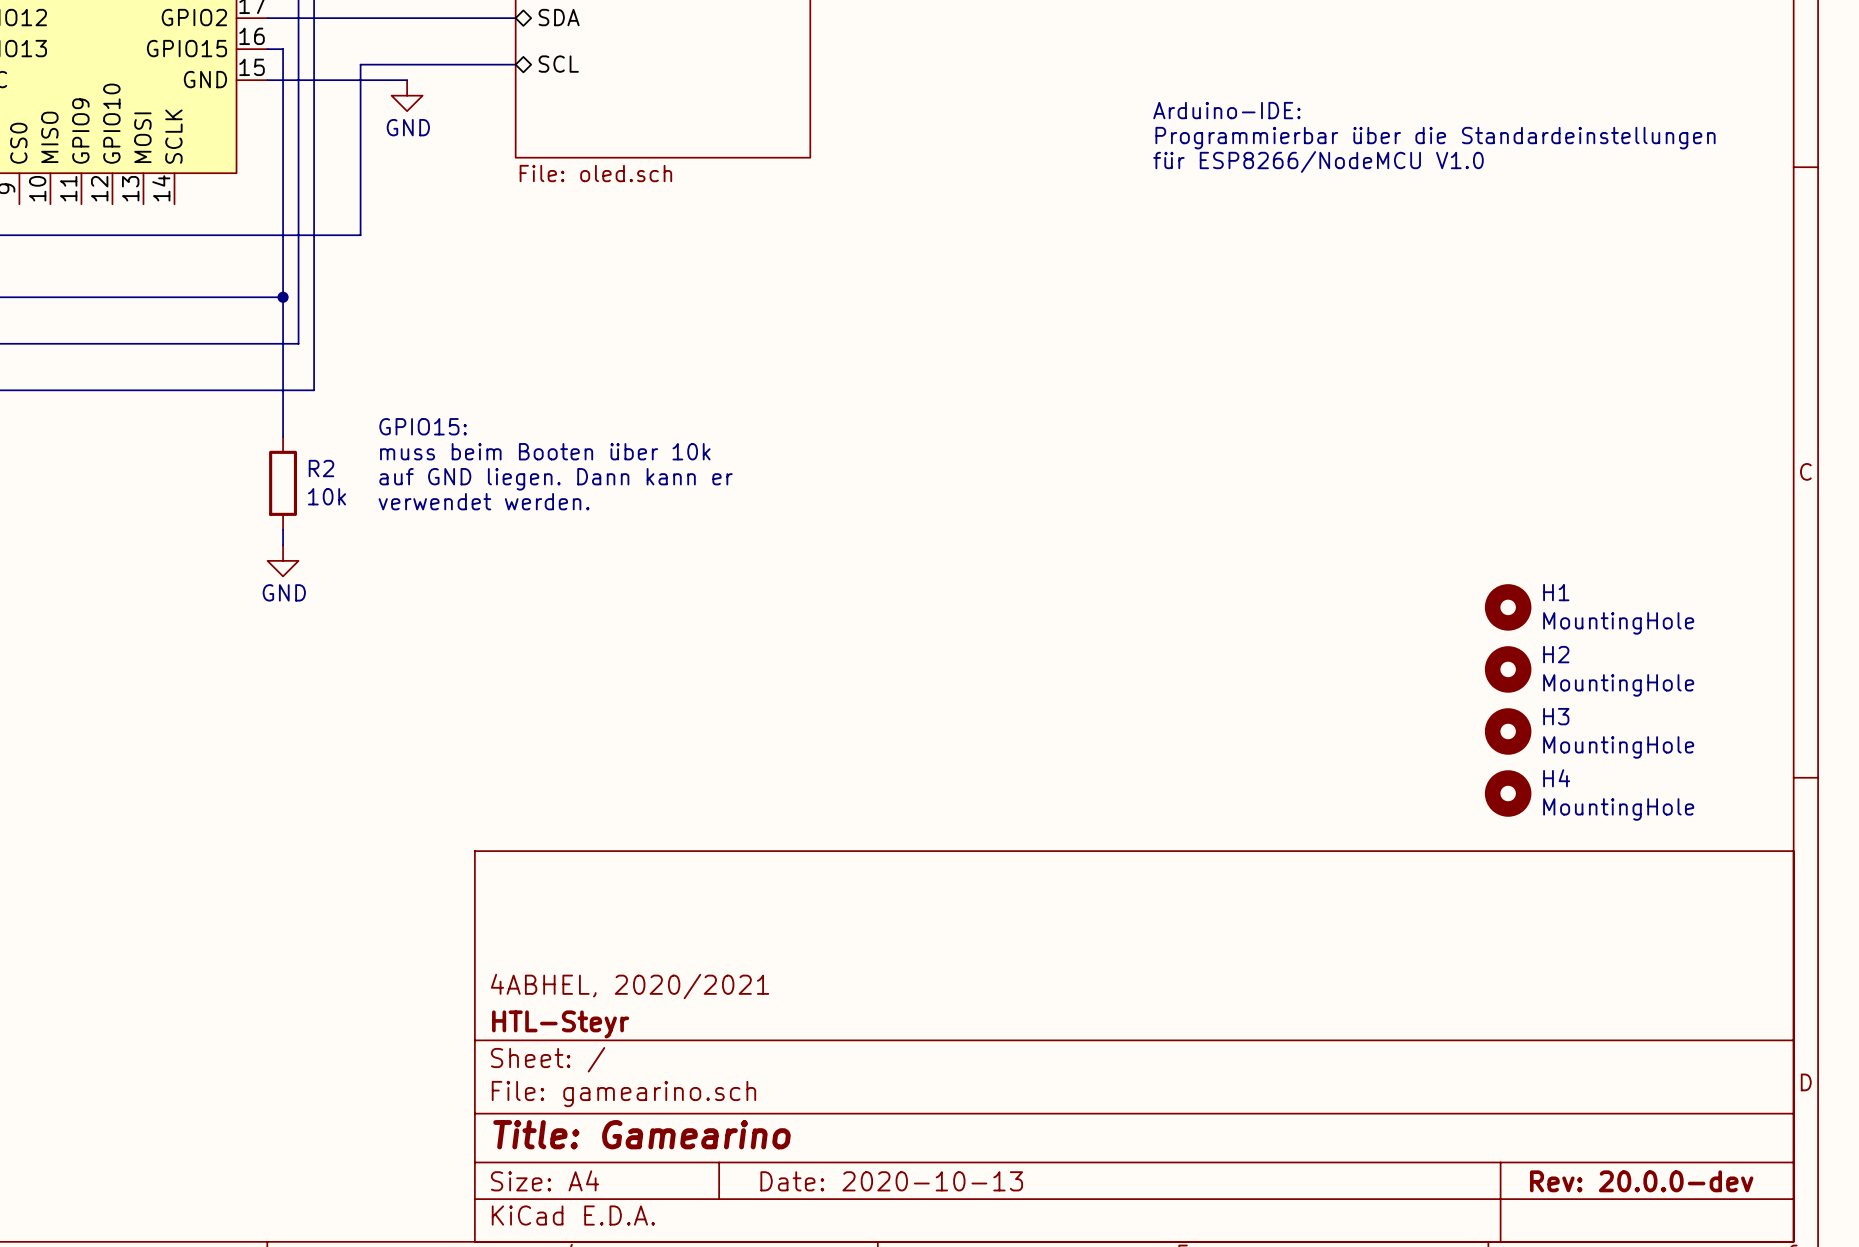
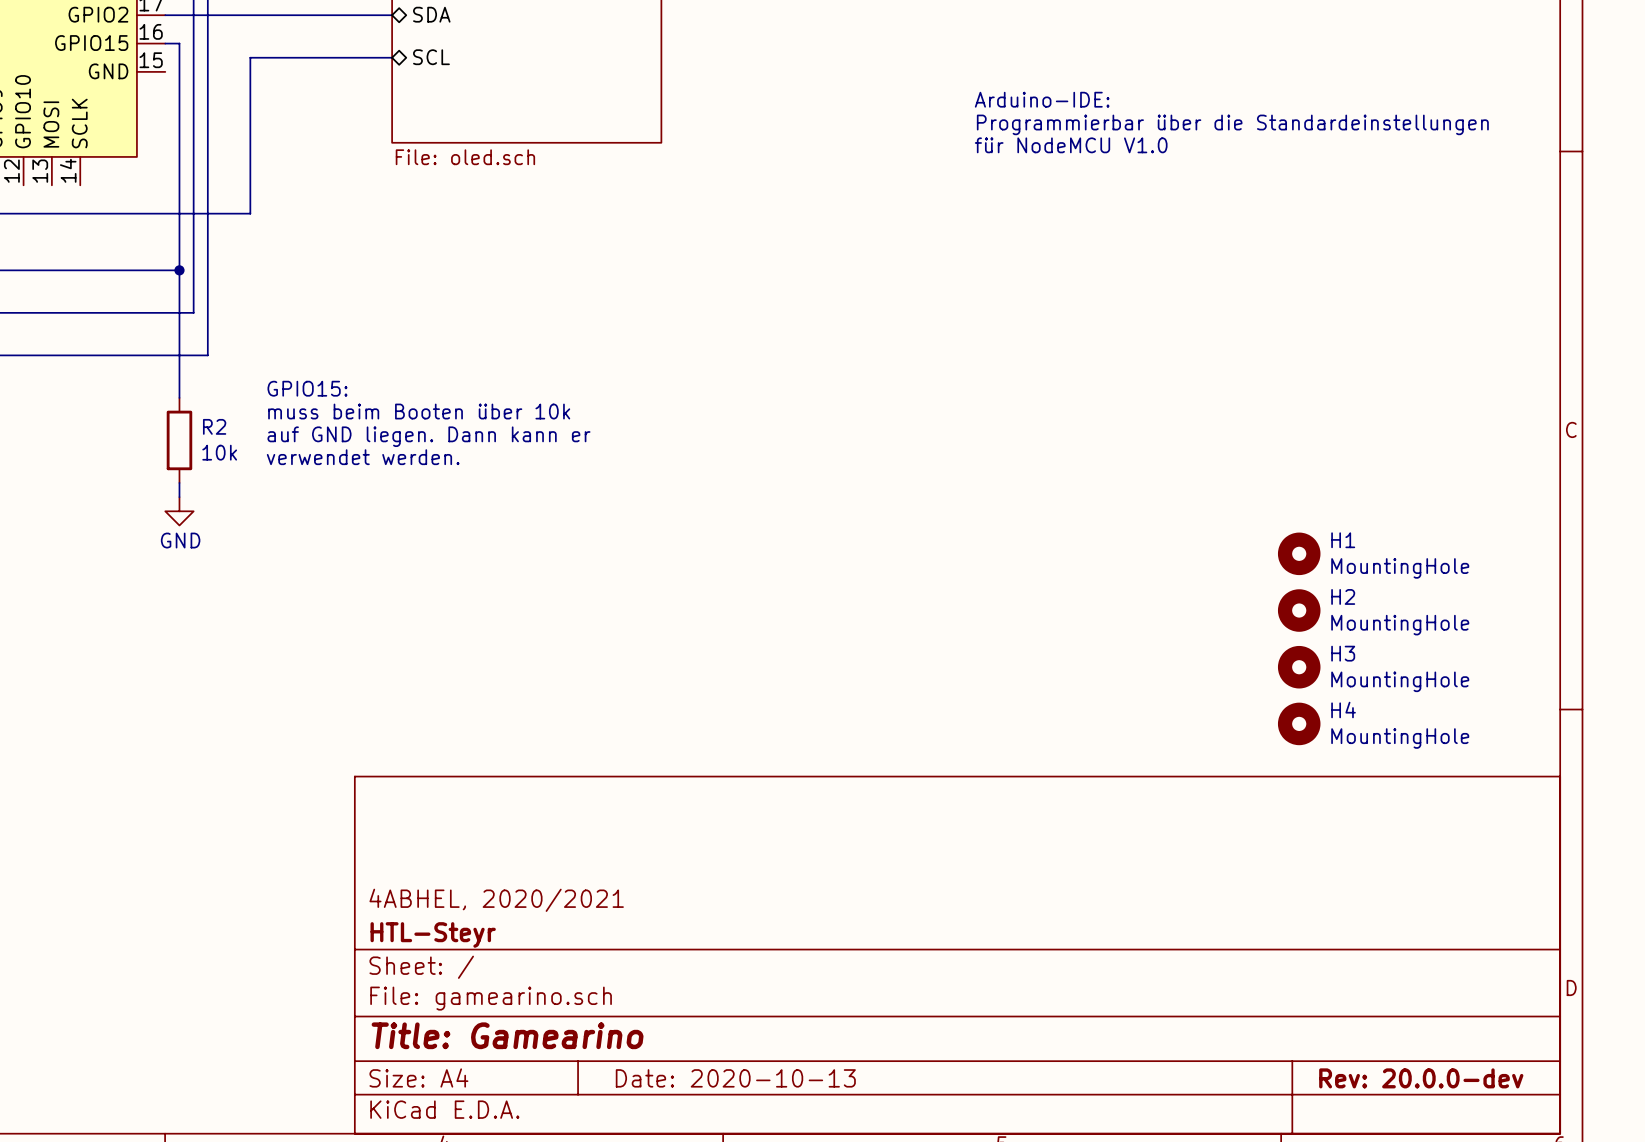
wire: (267, 80) (407, 80) -> none
power symbol: GND (407, 95) -> none
text: für ESP8266/NodeMCU V1.0 (1318, 161) -> für NodeMCU V1.0 (1071, 145)

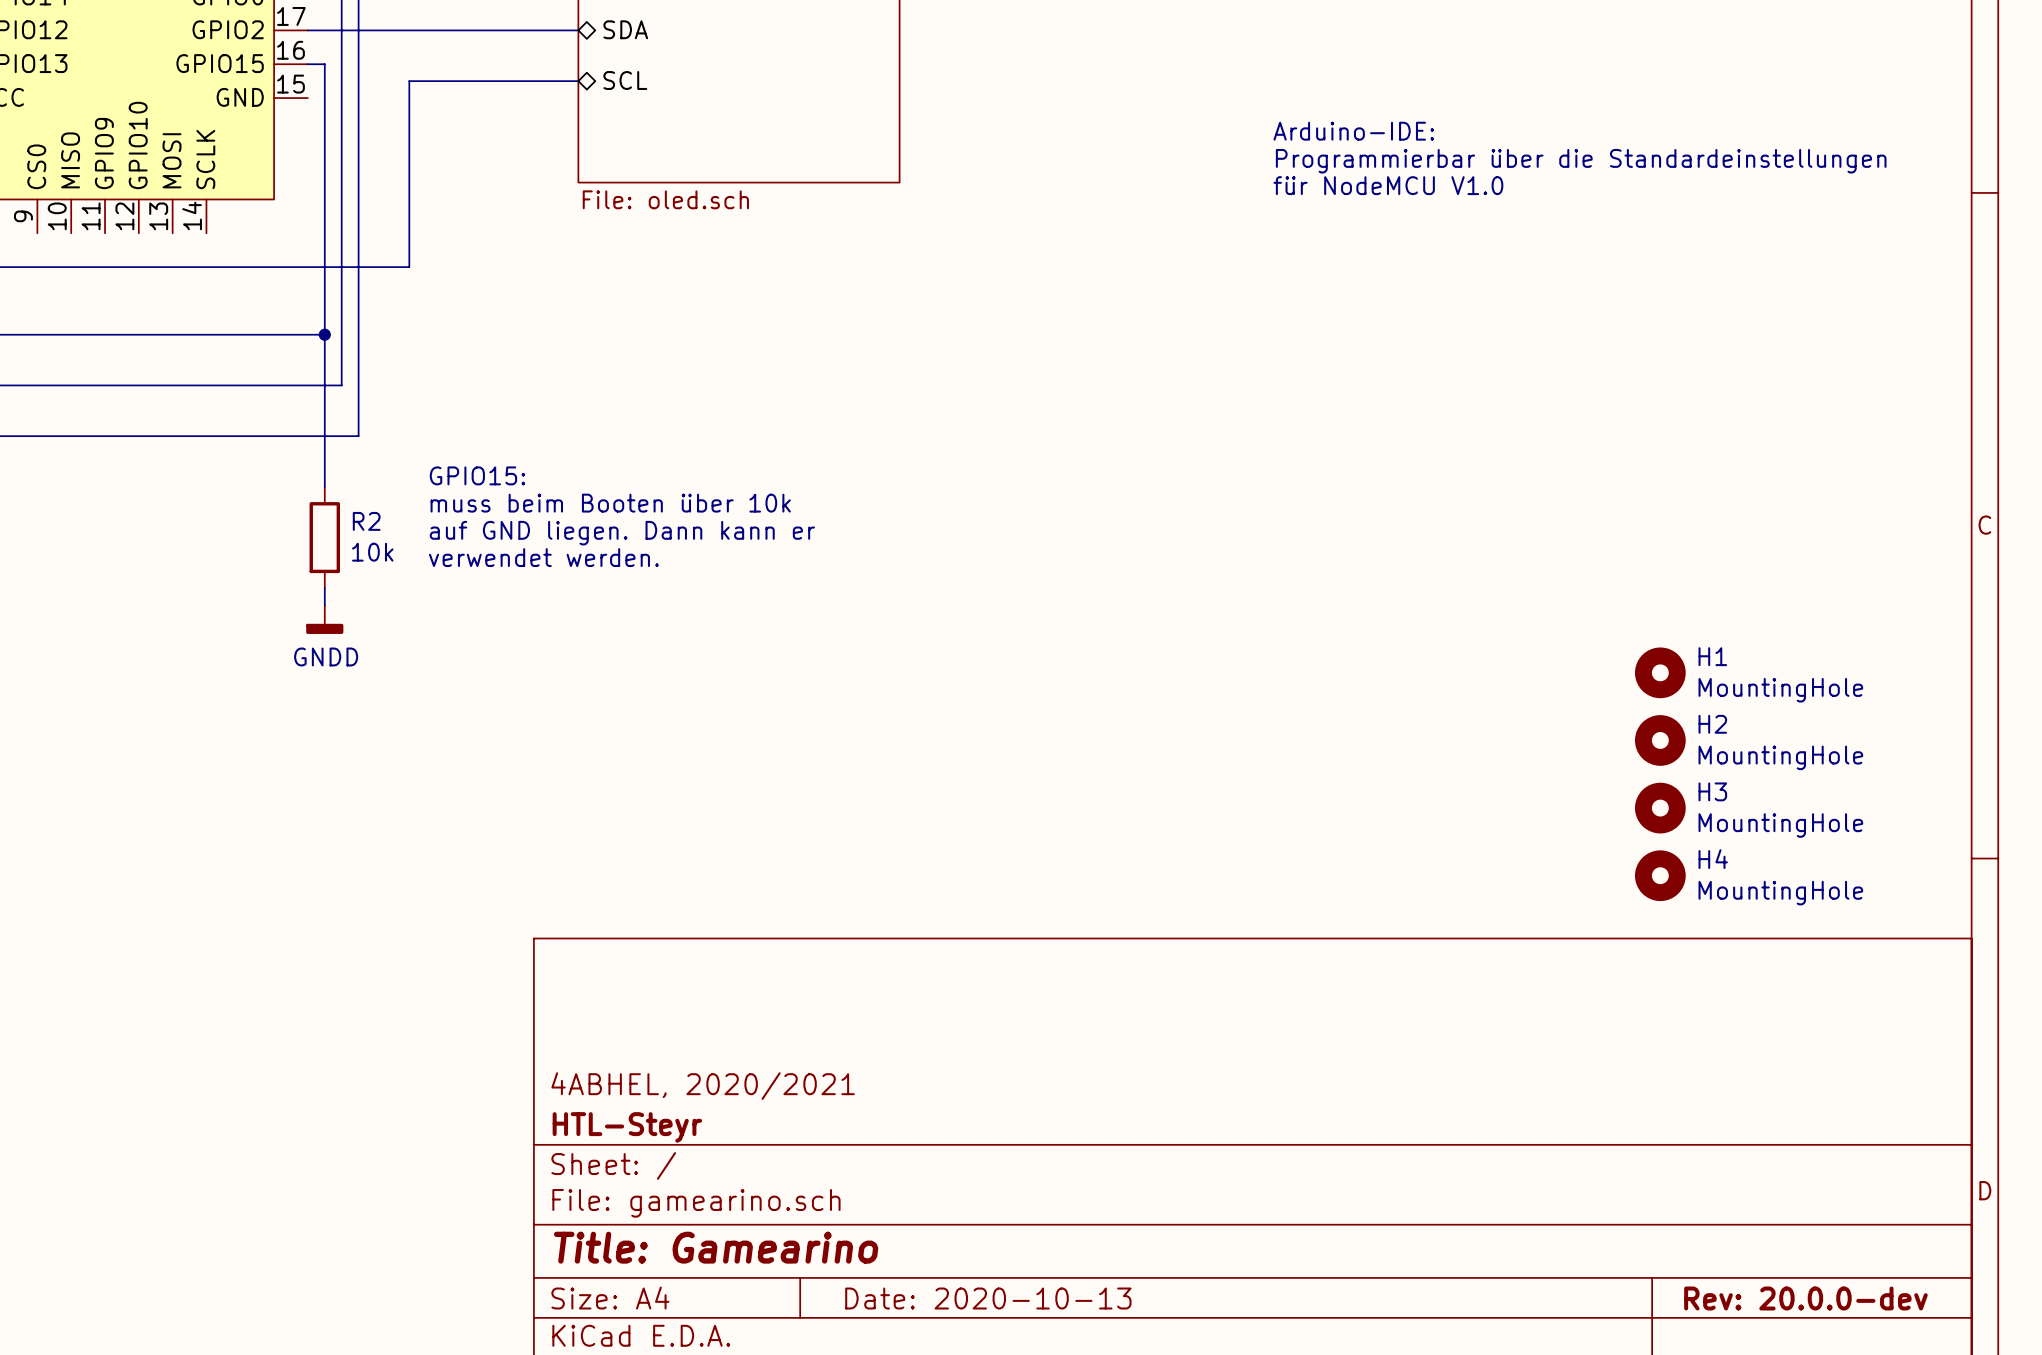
power symbol: GND (179, 511) -> GNDD (324, 619)

